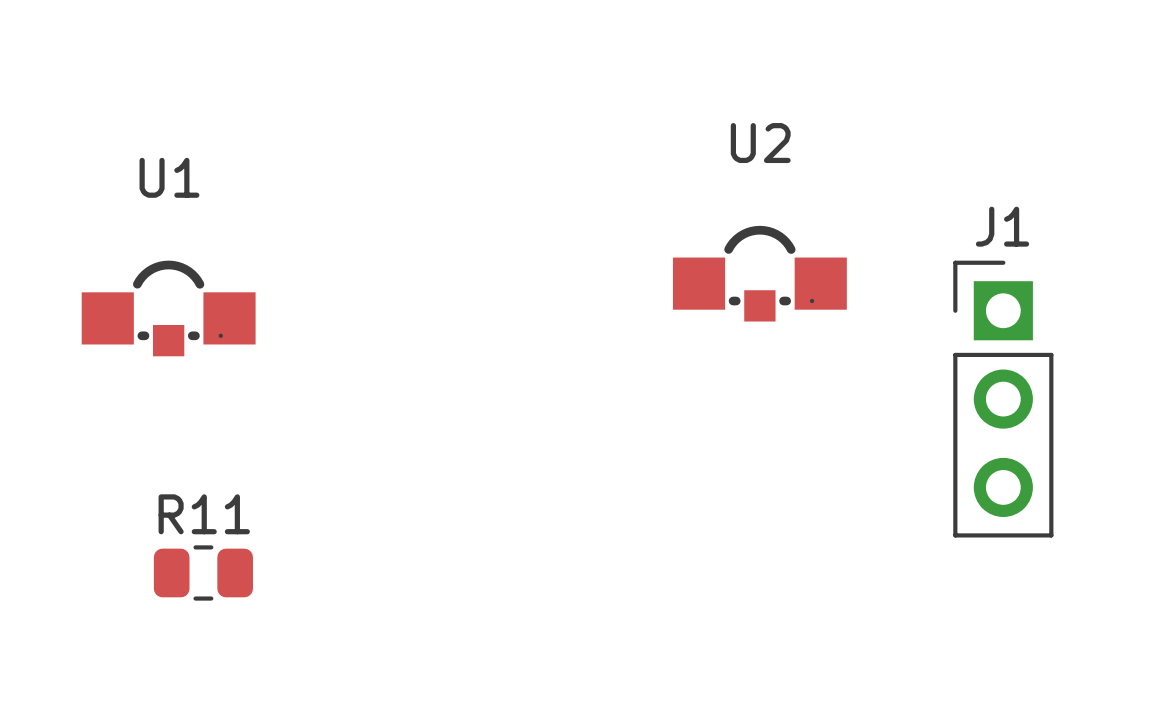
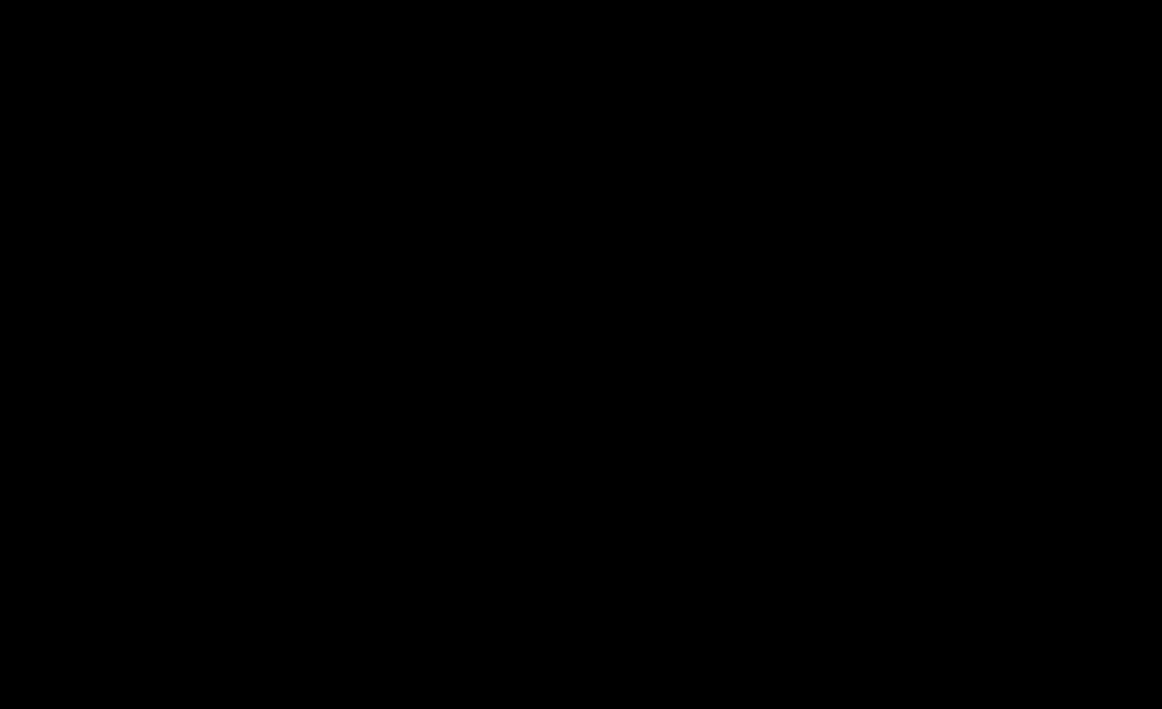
U2: (759, 273) -> none
U1: (168, 308) -> none
J1: (1003, 399) -> none
R11: (203, 572) -> none

